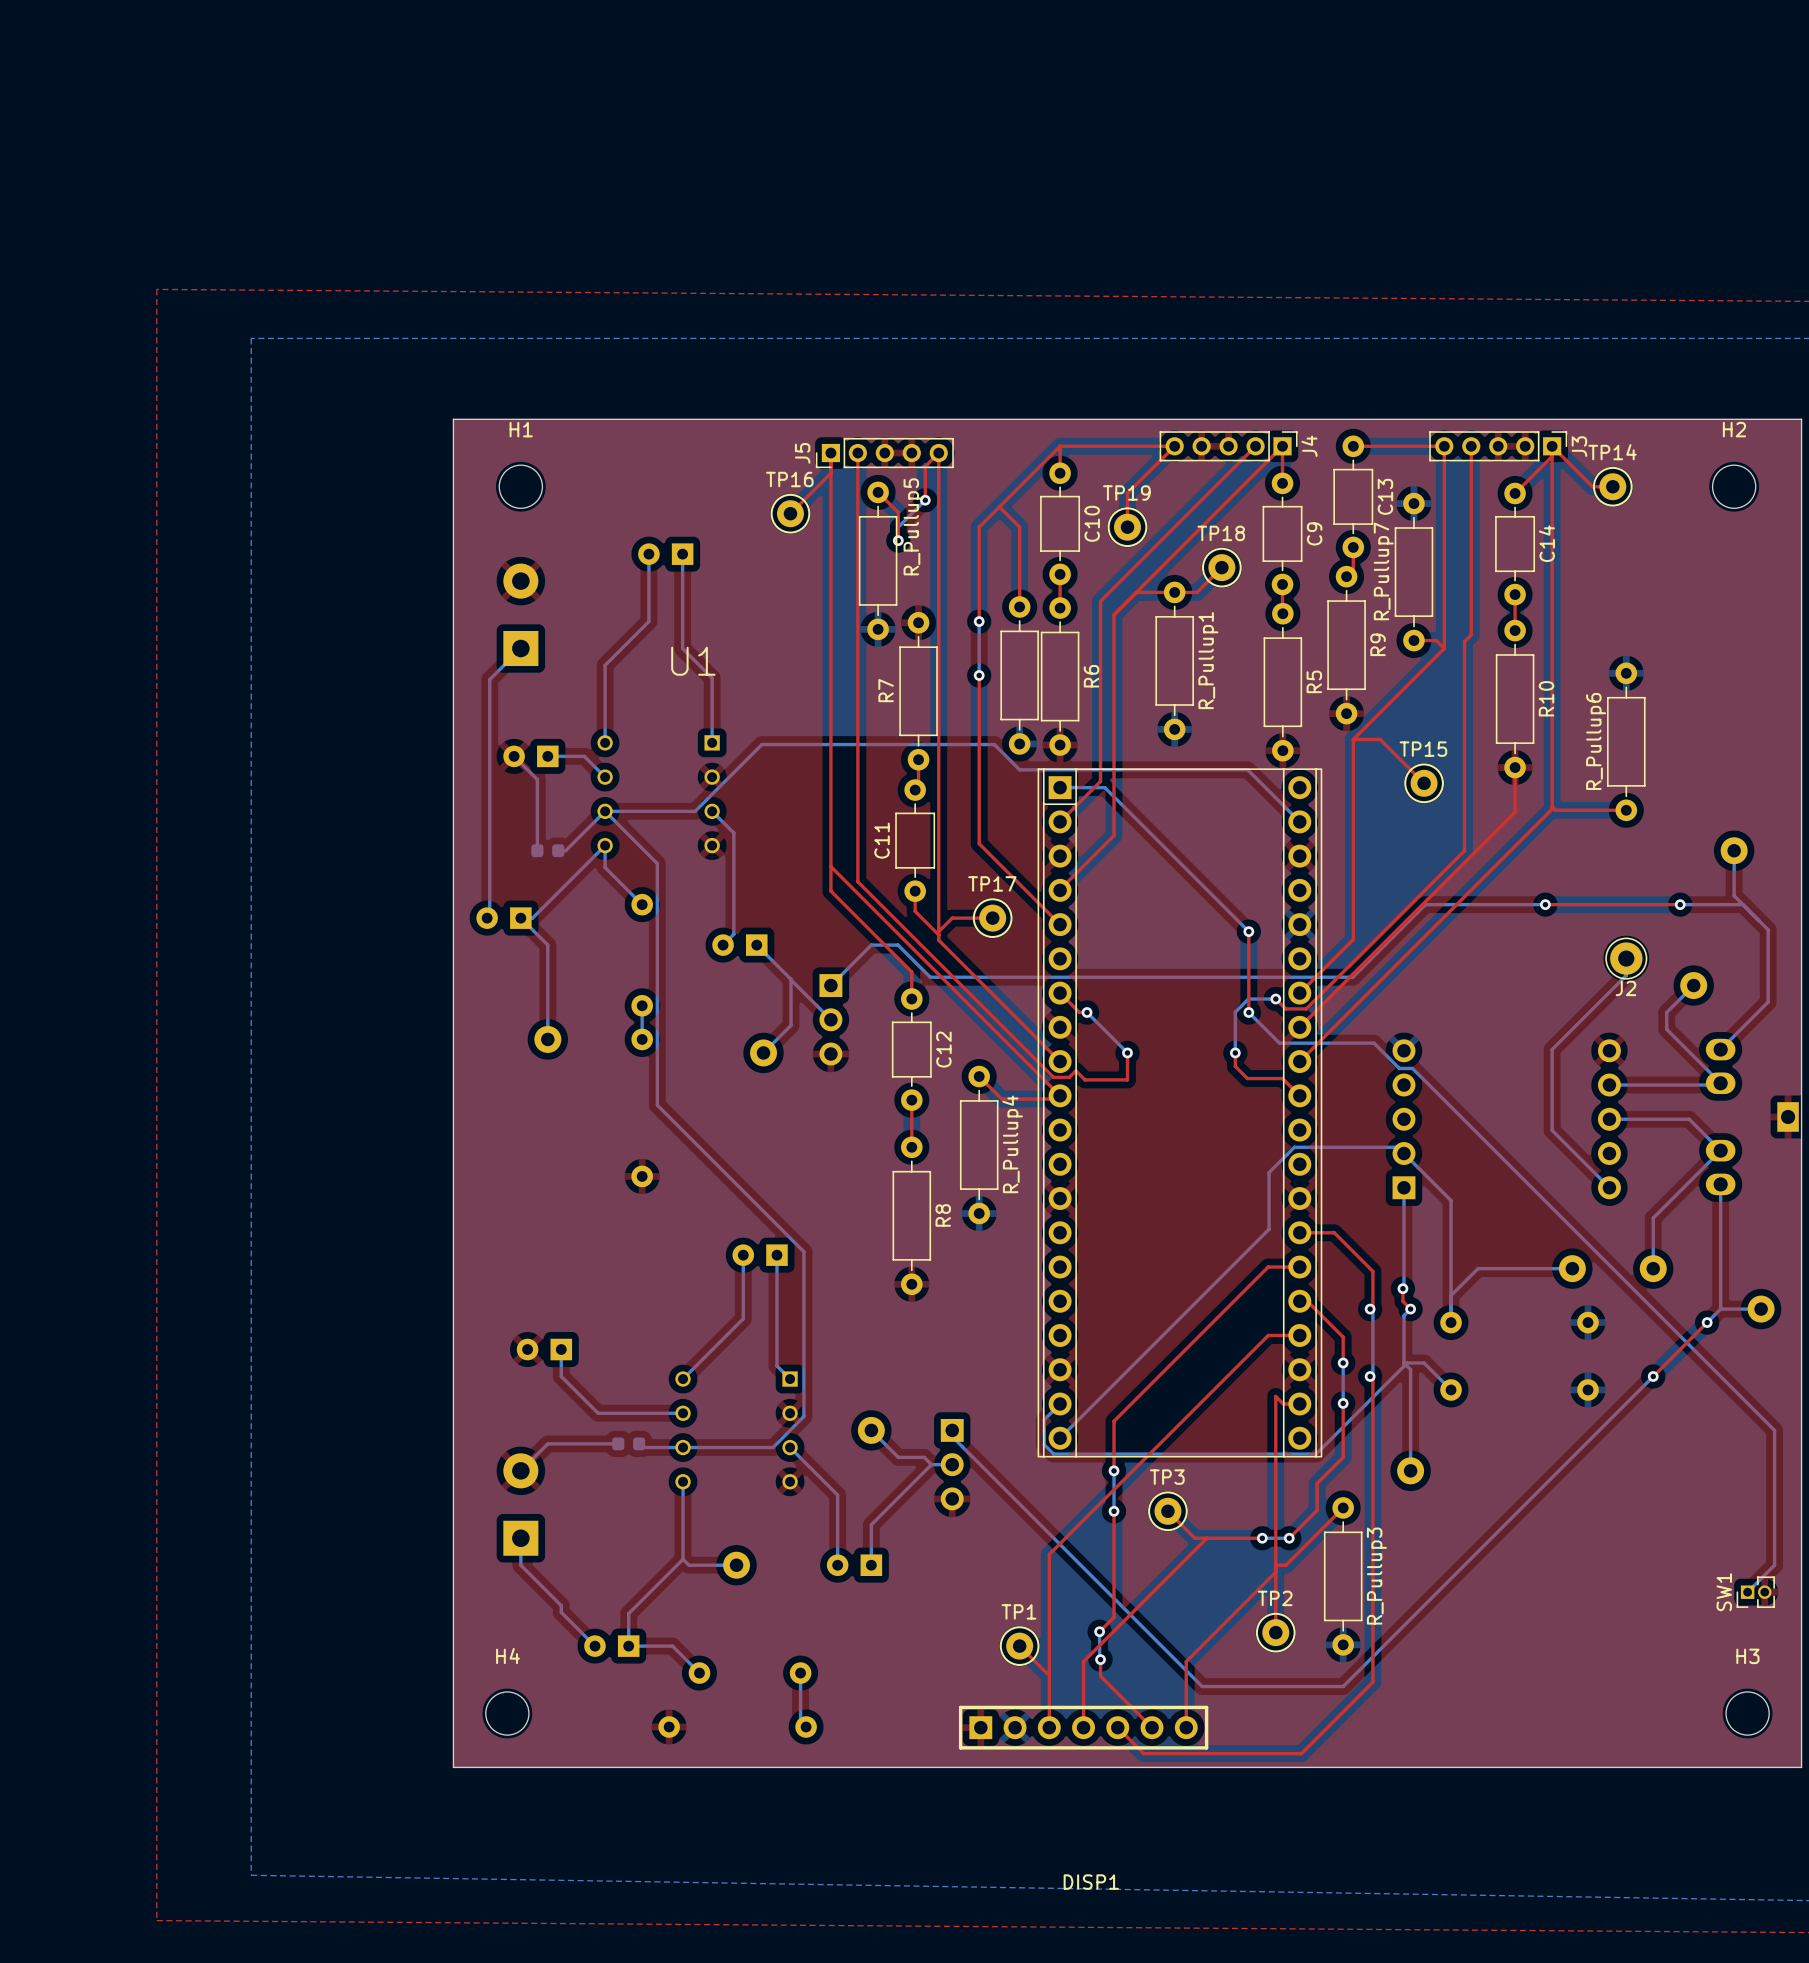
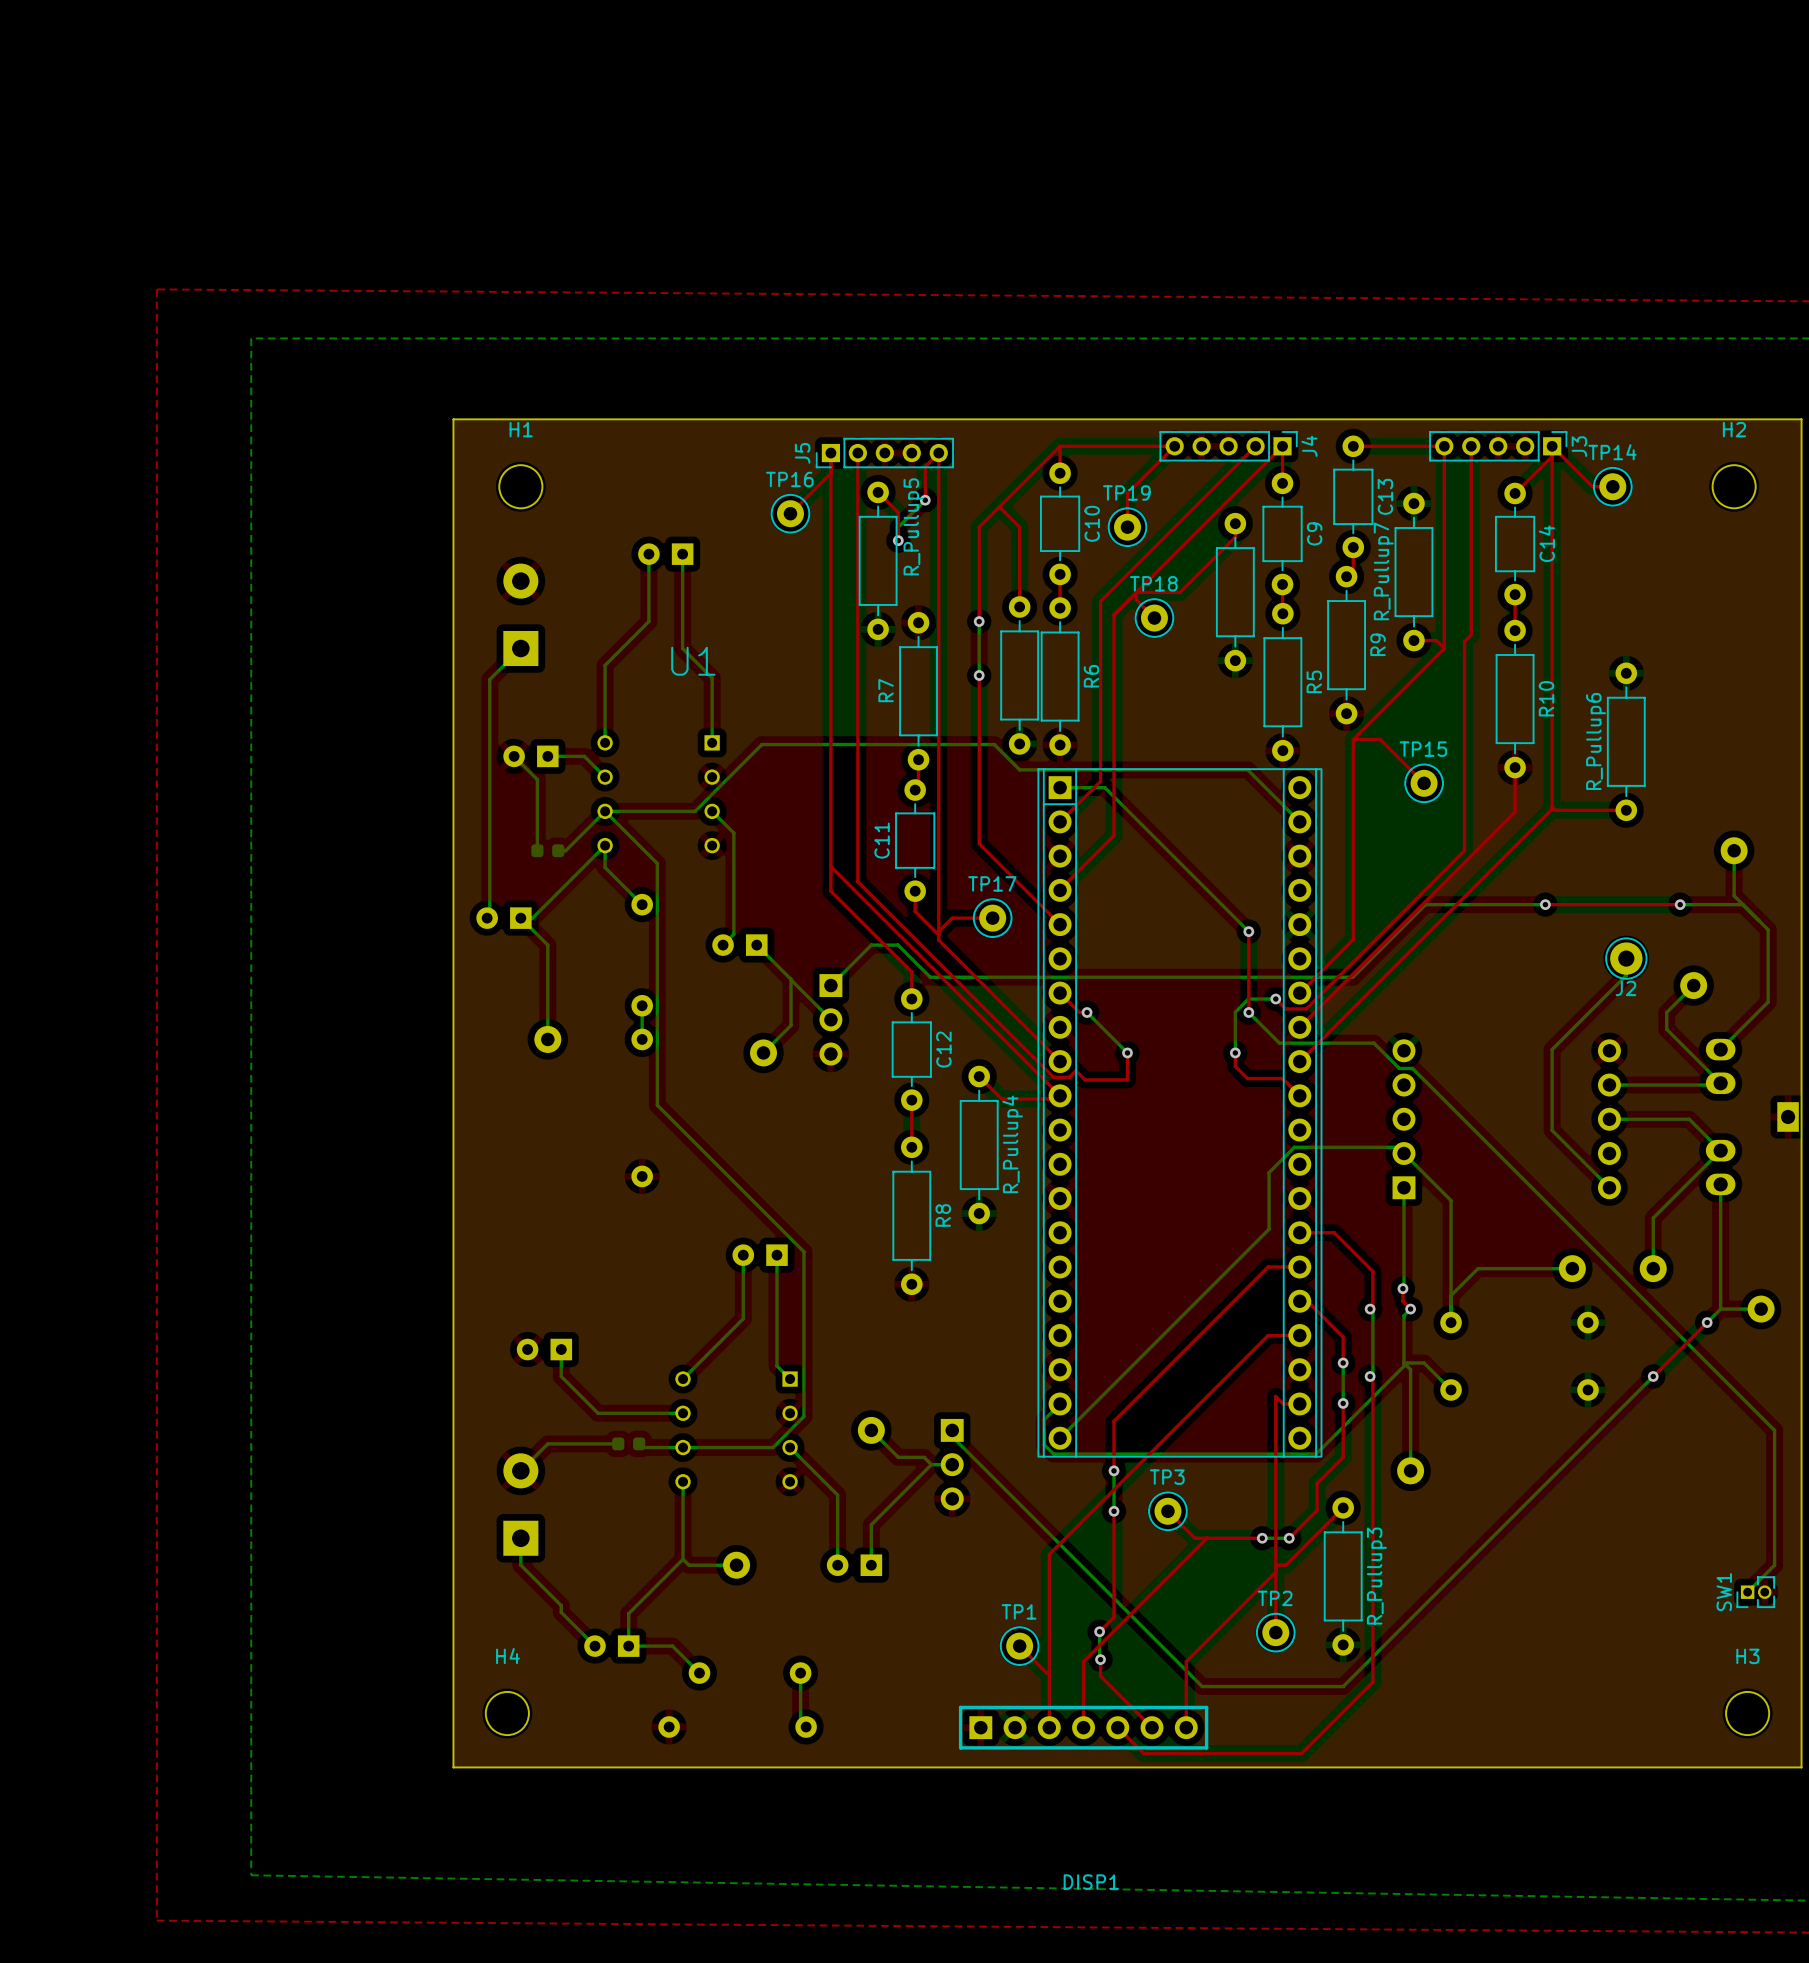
top track: (1221, 567) (1197, 592) (1180, 592) -> (1235, 523) (1235, 537) (1180, 592)
TP18 position: (1221, 567) -> (1154, 618)
top track: none -> (1136, 592) (1136, 599) (1154, 618)
part: none -> (1235, 592)
R_Pullup1: (1174, 660) -> none

